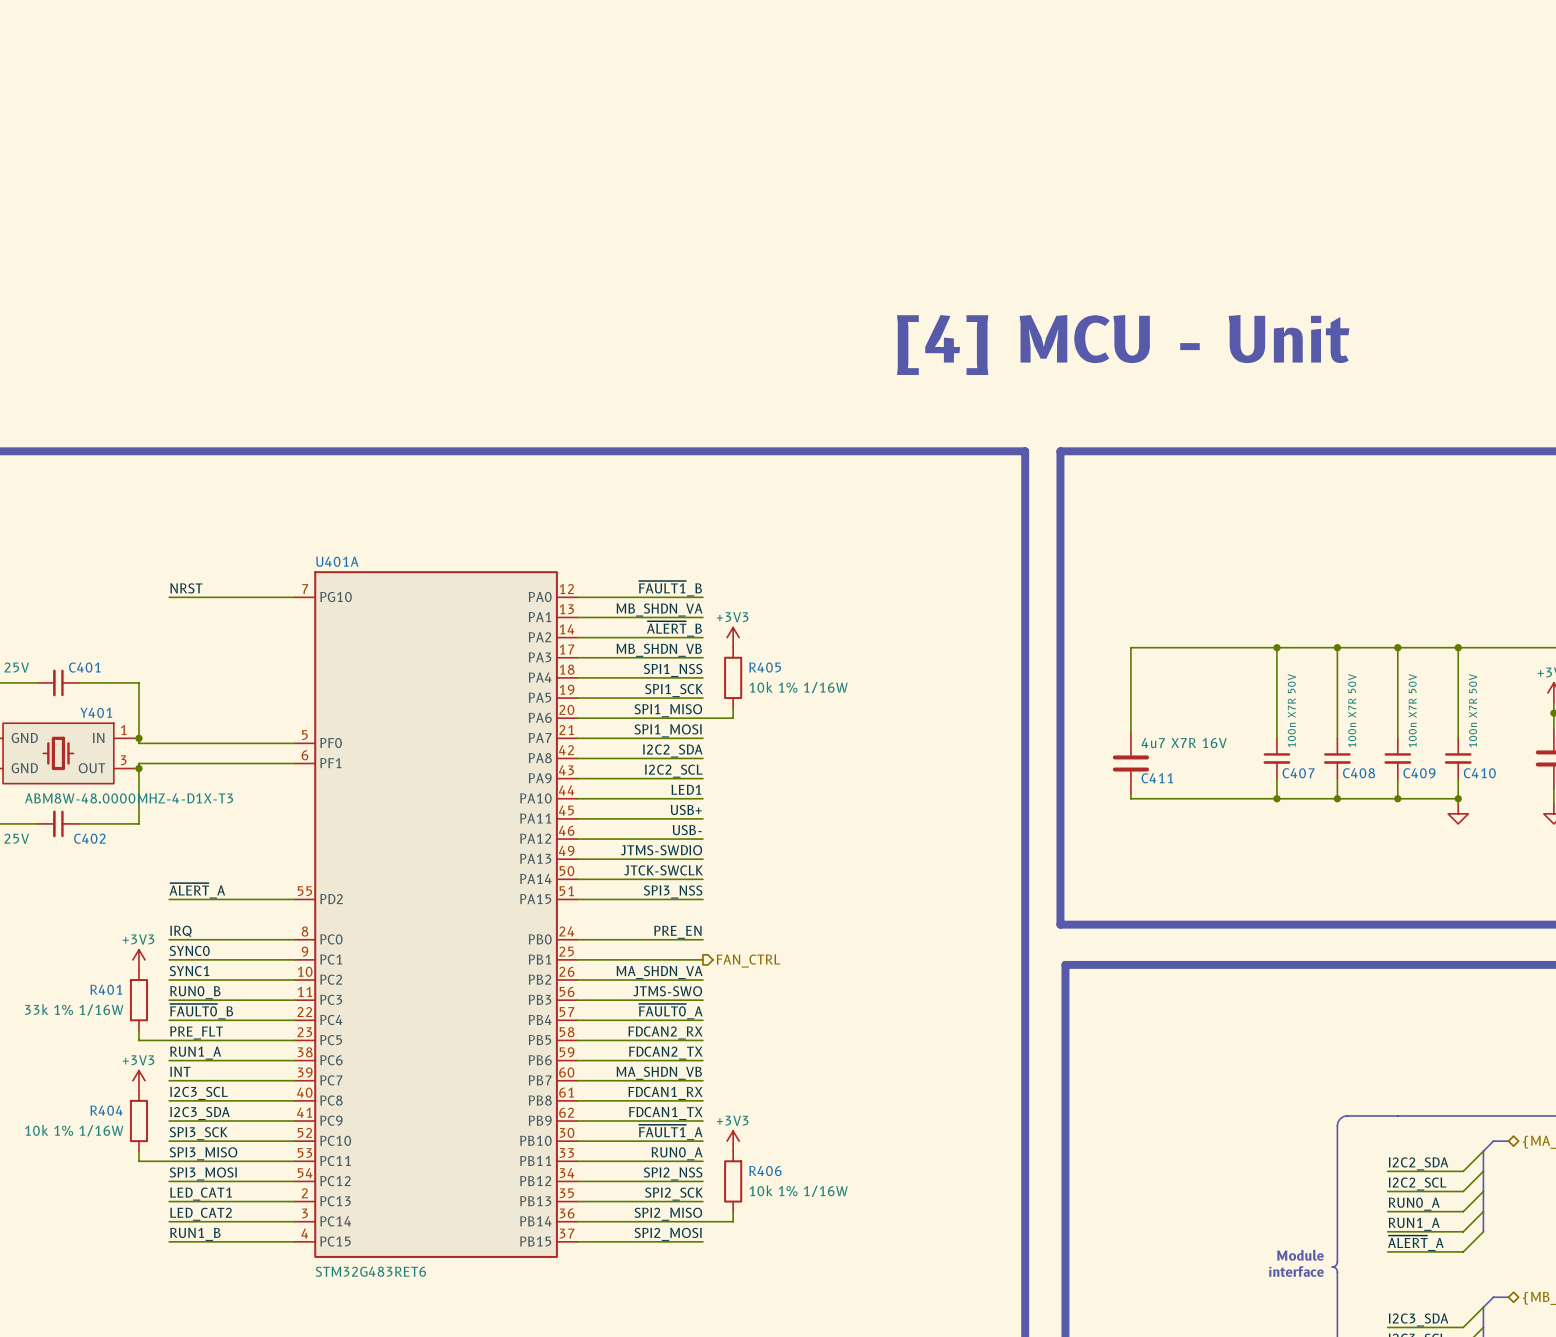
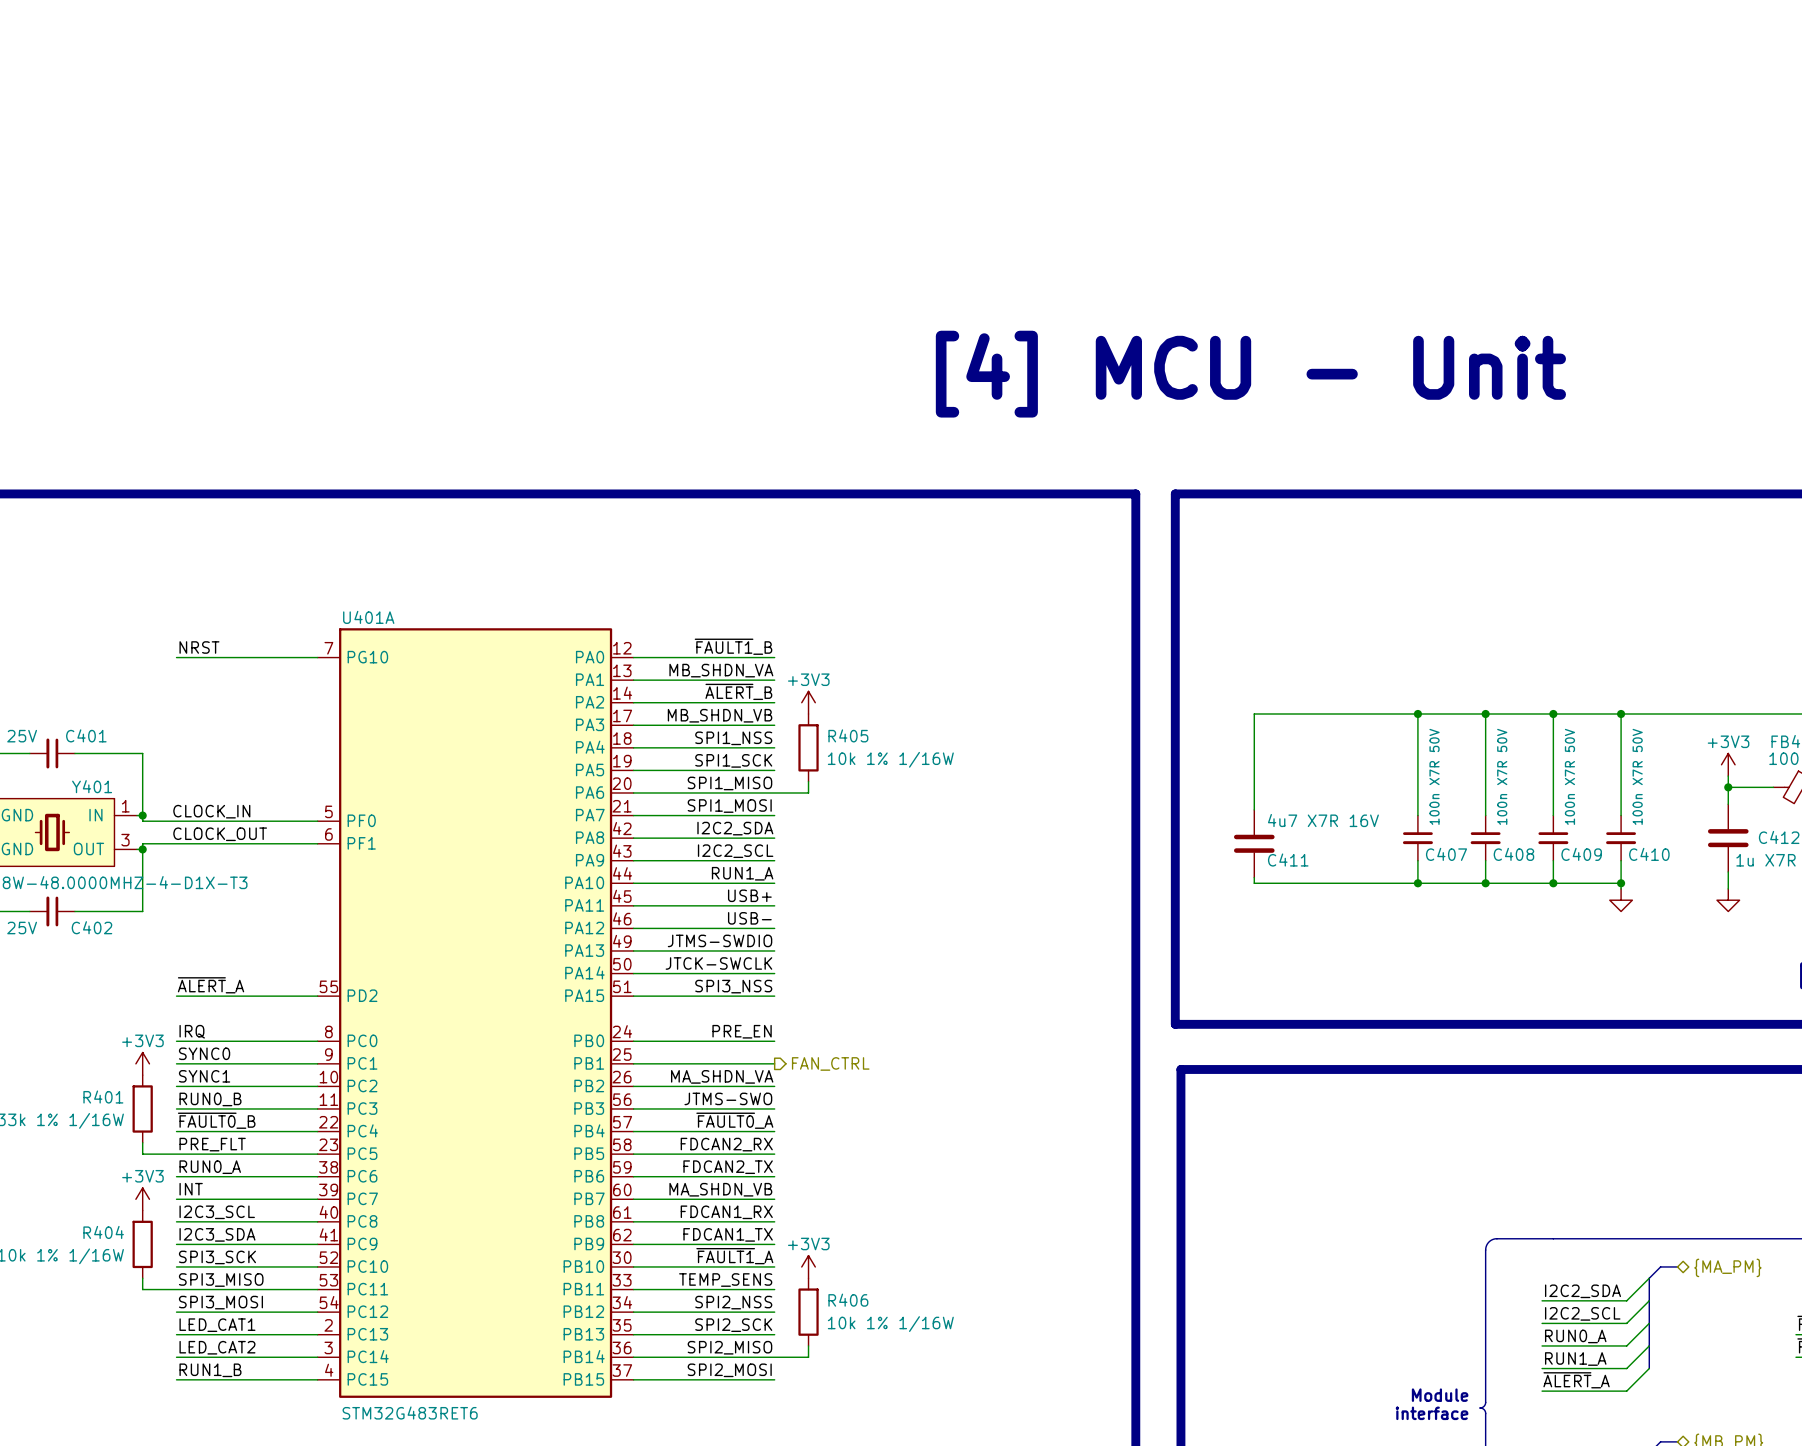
label: none -> CLOCK_IN (211, 811)
label: none -> CLOCK_OUT (220, 834)
label: LED1 (686, 789) -> RUN1_A (742, 873)
label: RUN1_A (195, 1053) -> RUN0_A (210, 1167)
label: RUN0_A (677, 1153) -> TEMP_SENS (725, 1280)

